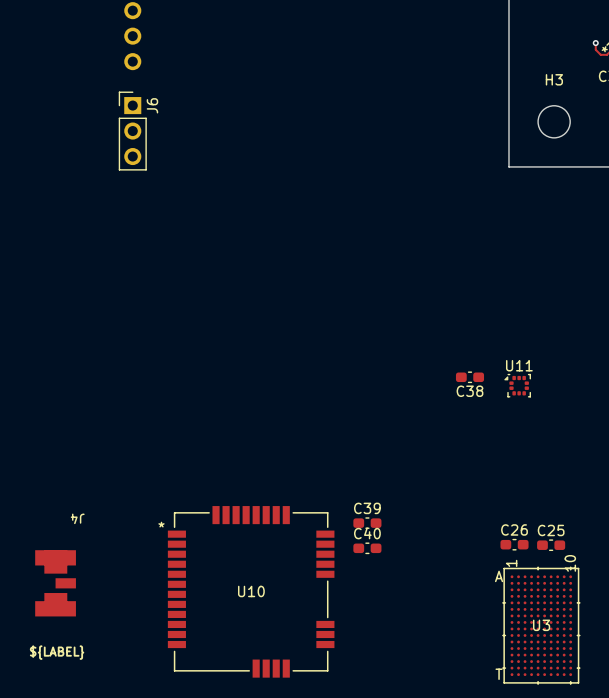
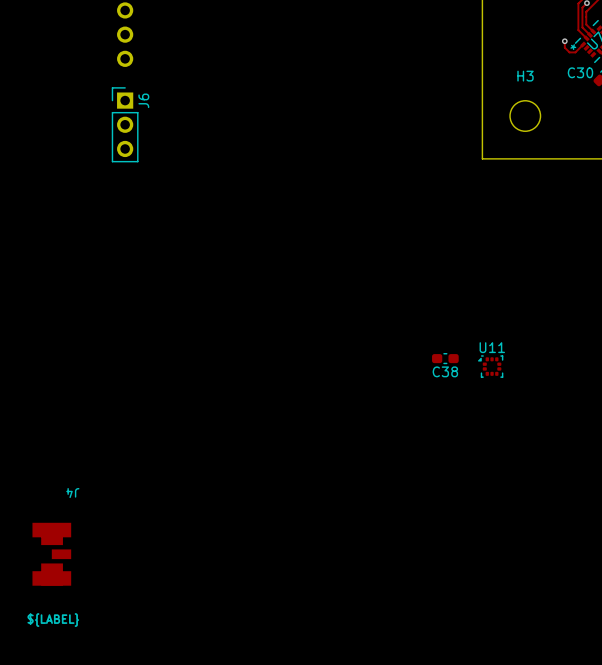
C39: (367, 523) -> none
C26: (514, 544) -> none
C25: (551, 545) -> none
C40: (367, 548) -> none
U10: (251, 591) -> none
U3: (541, 625) -> none

